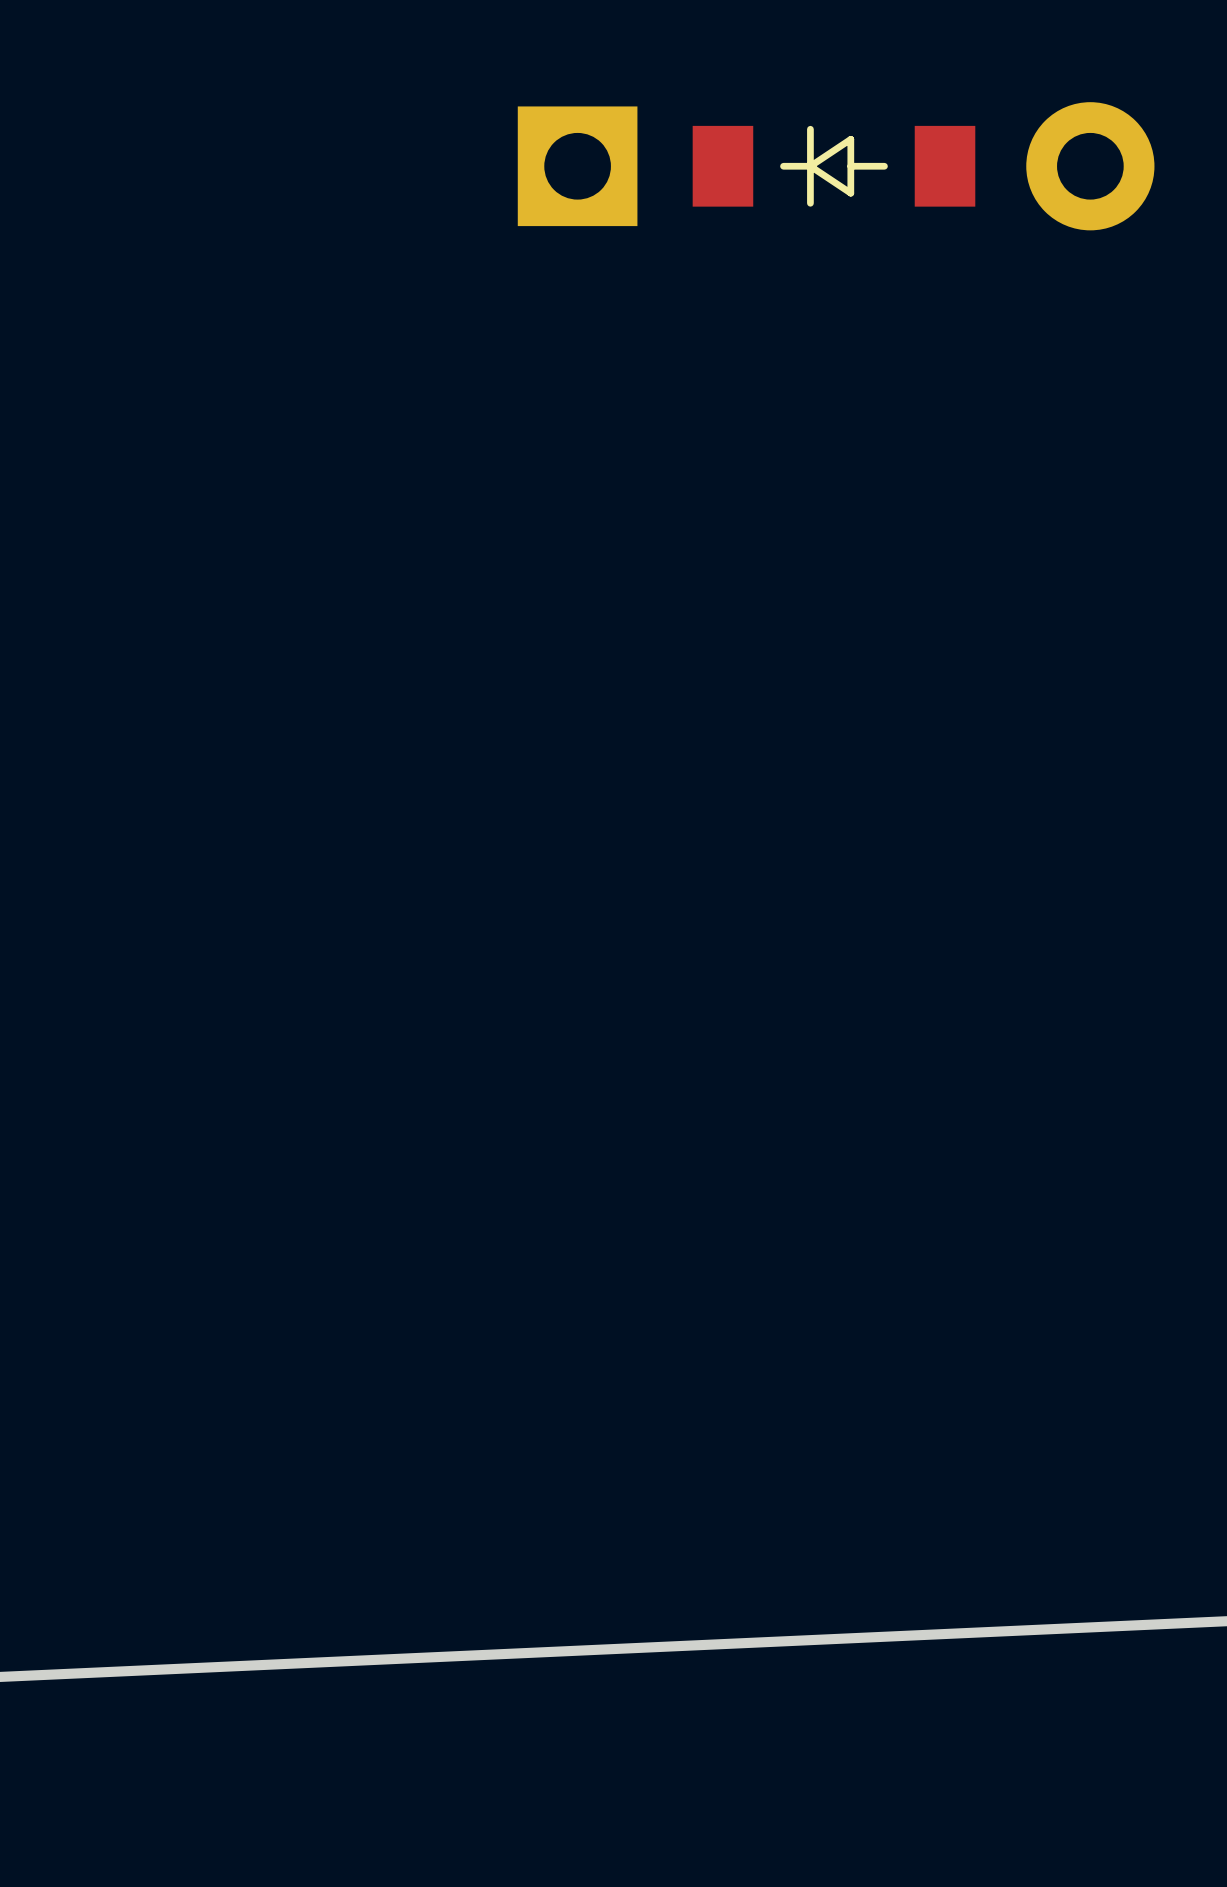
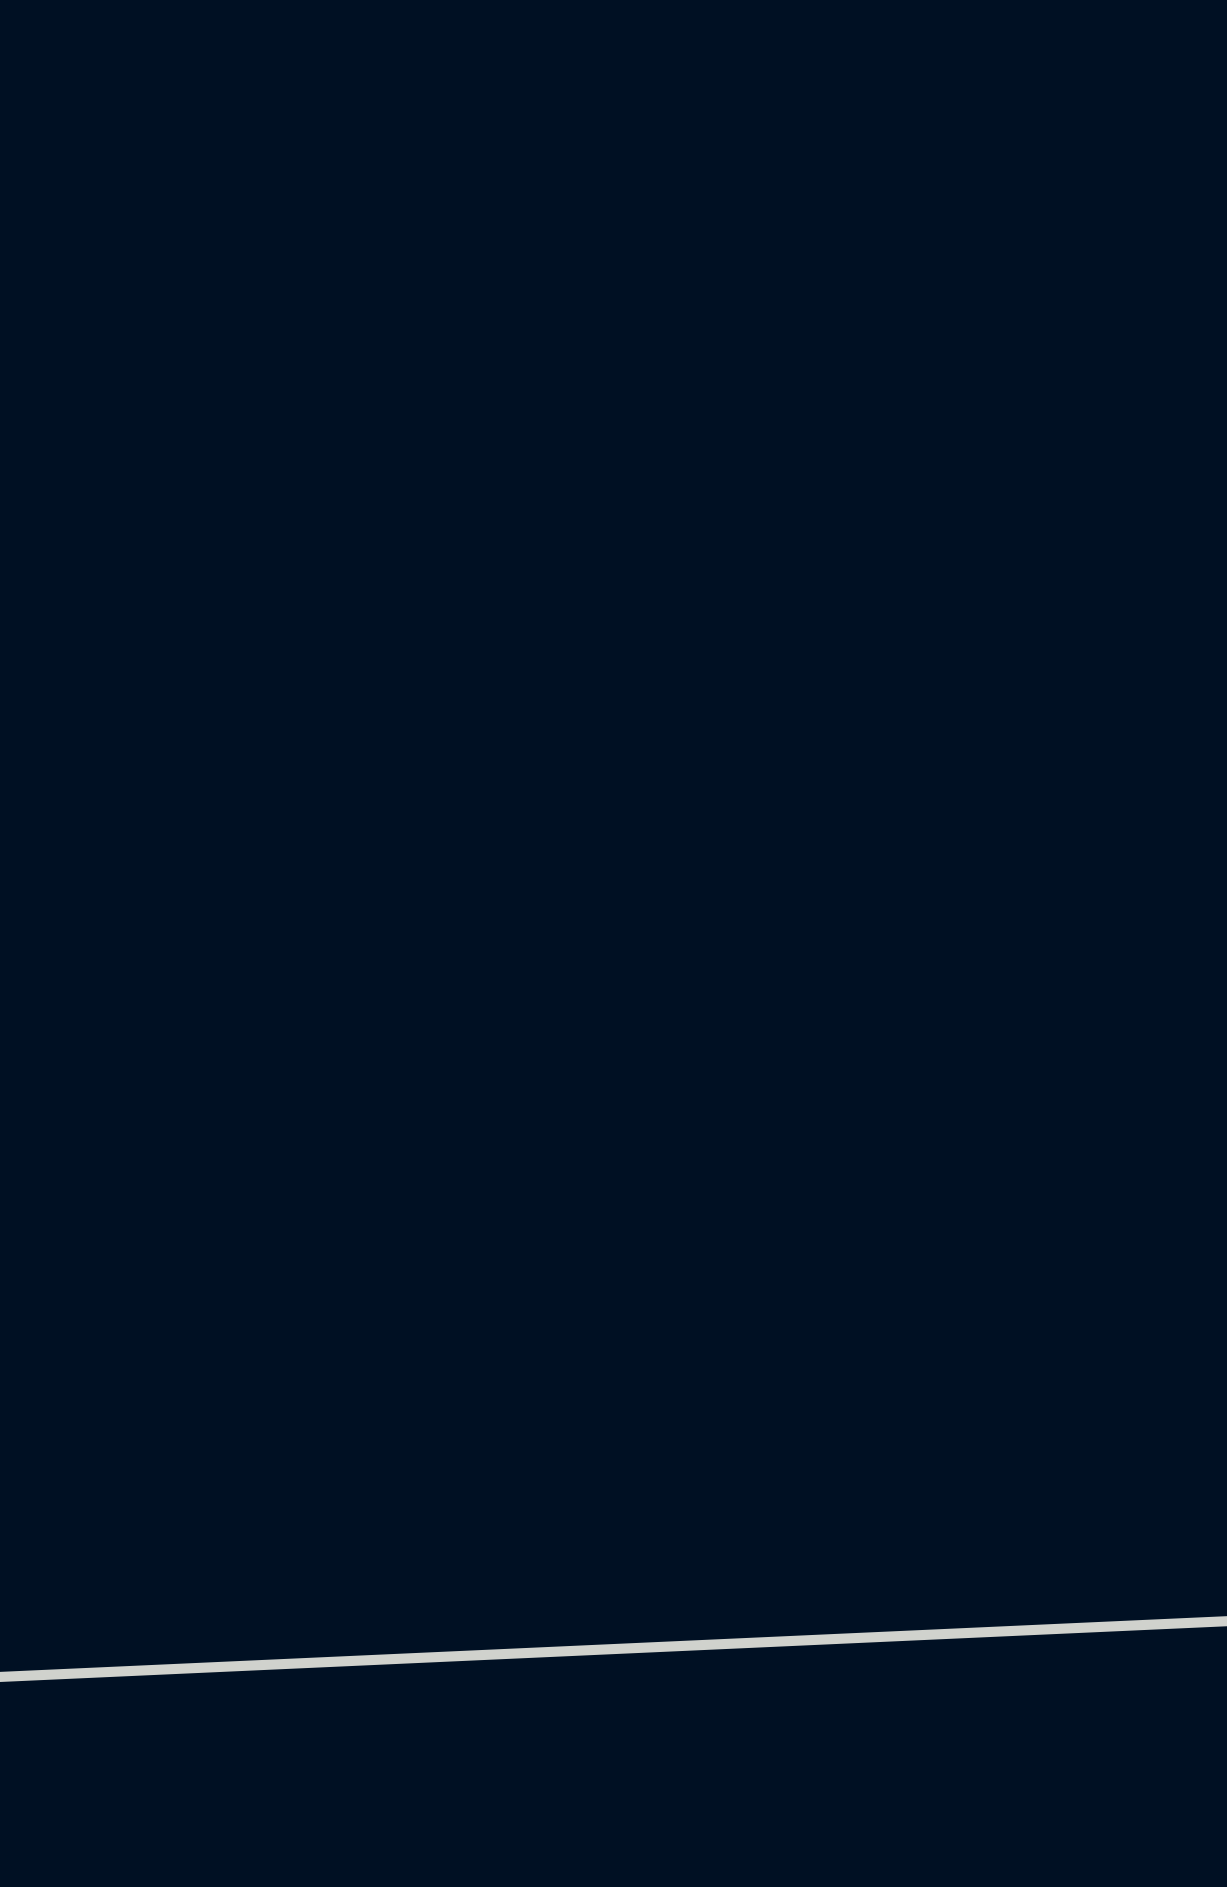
part: (836, 166) -> none

